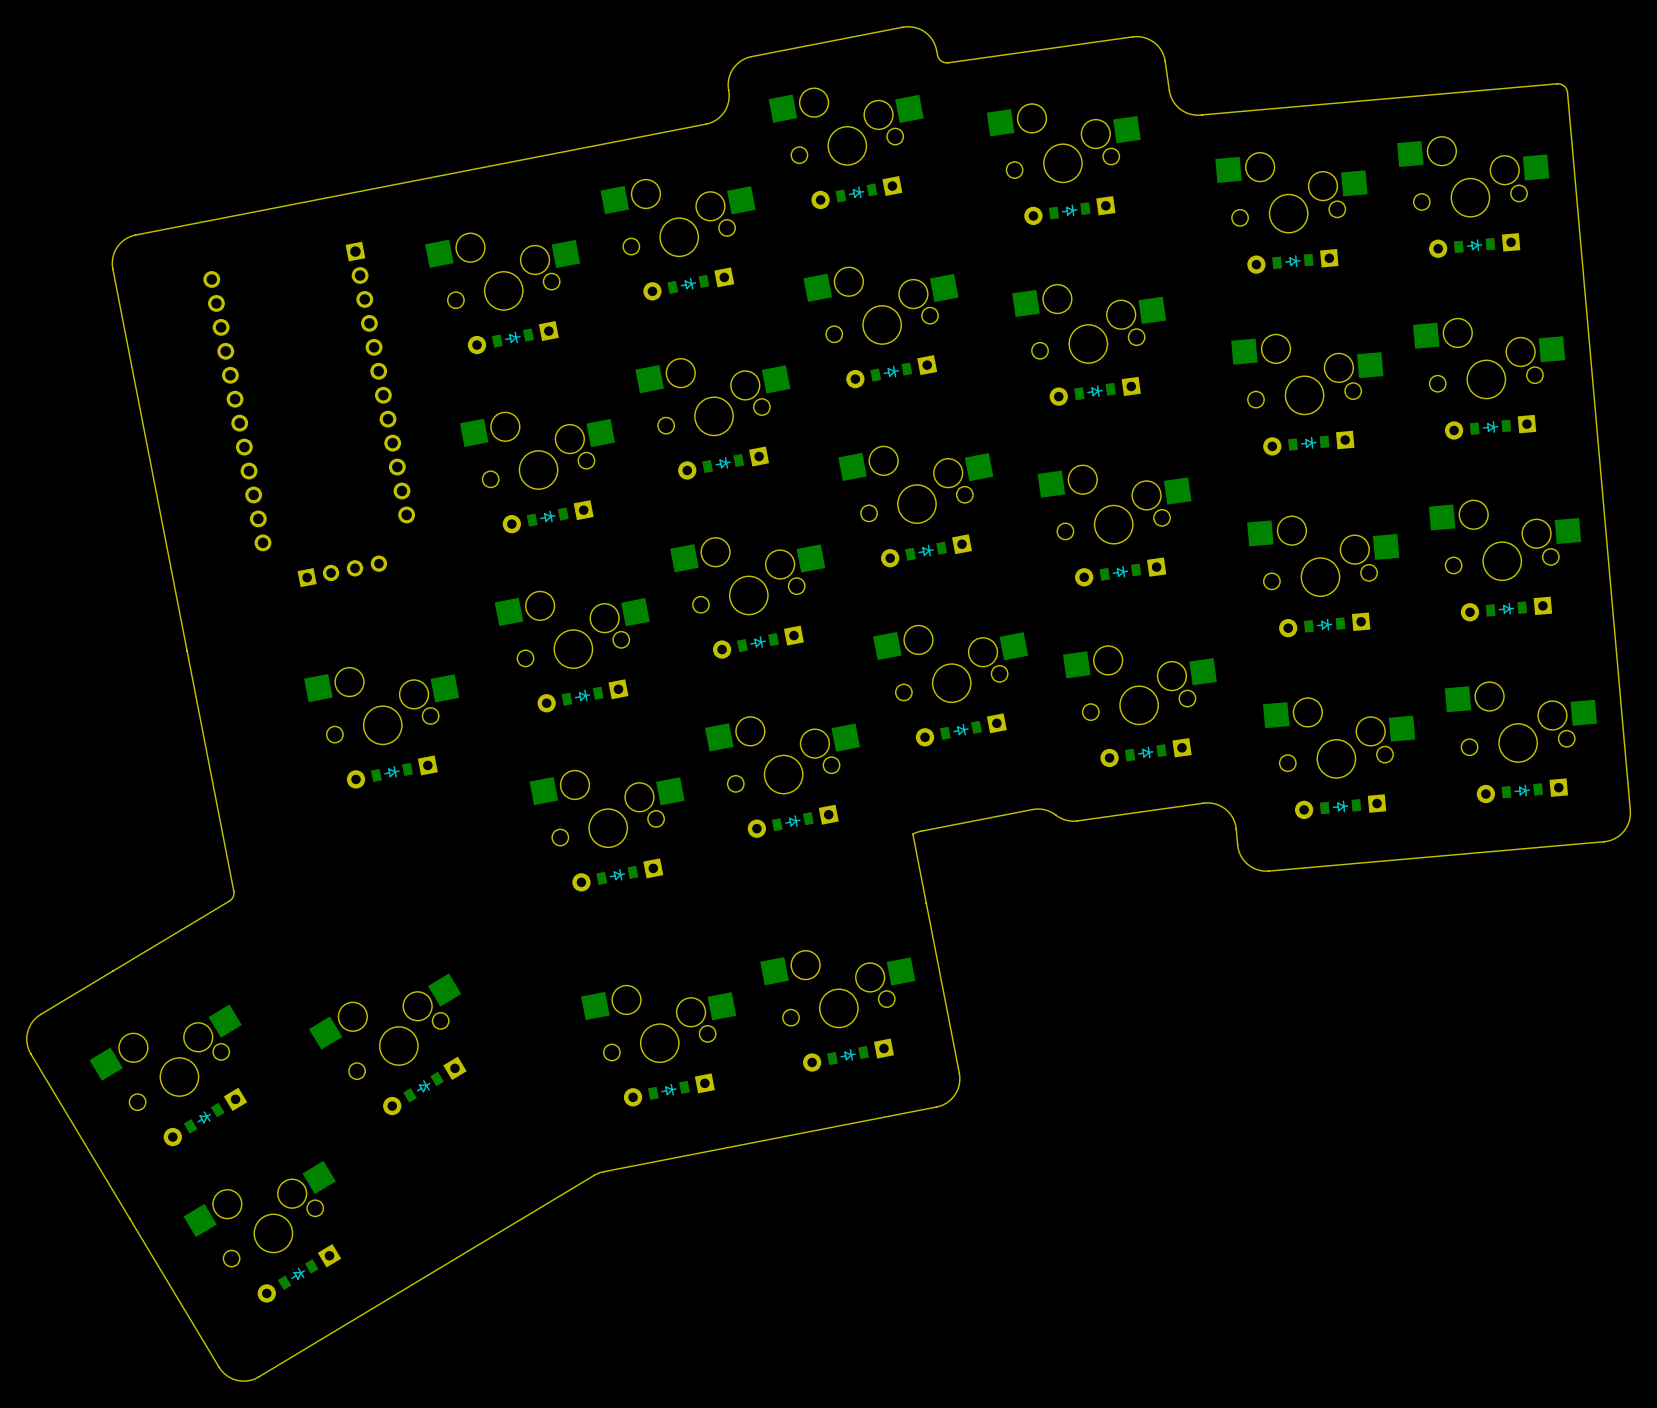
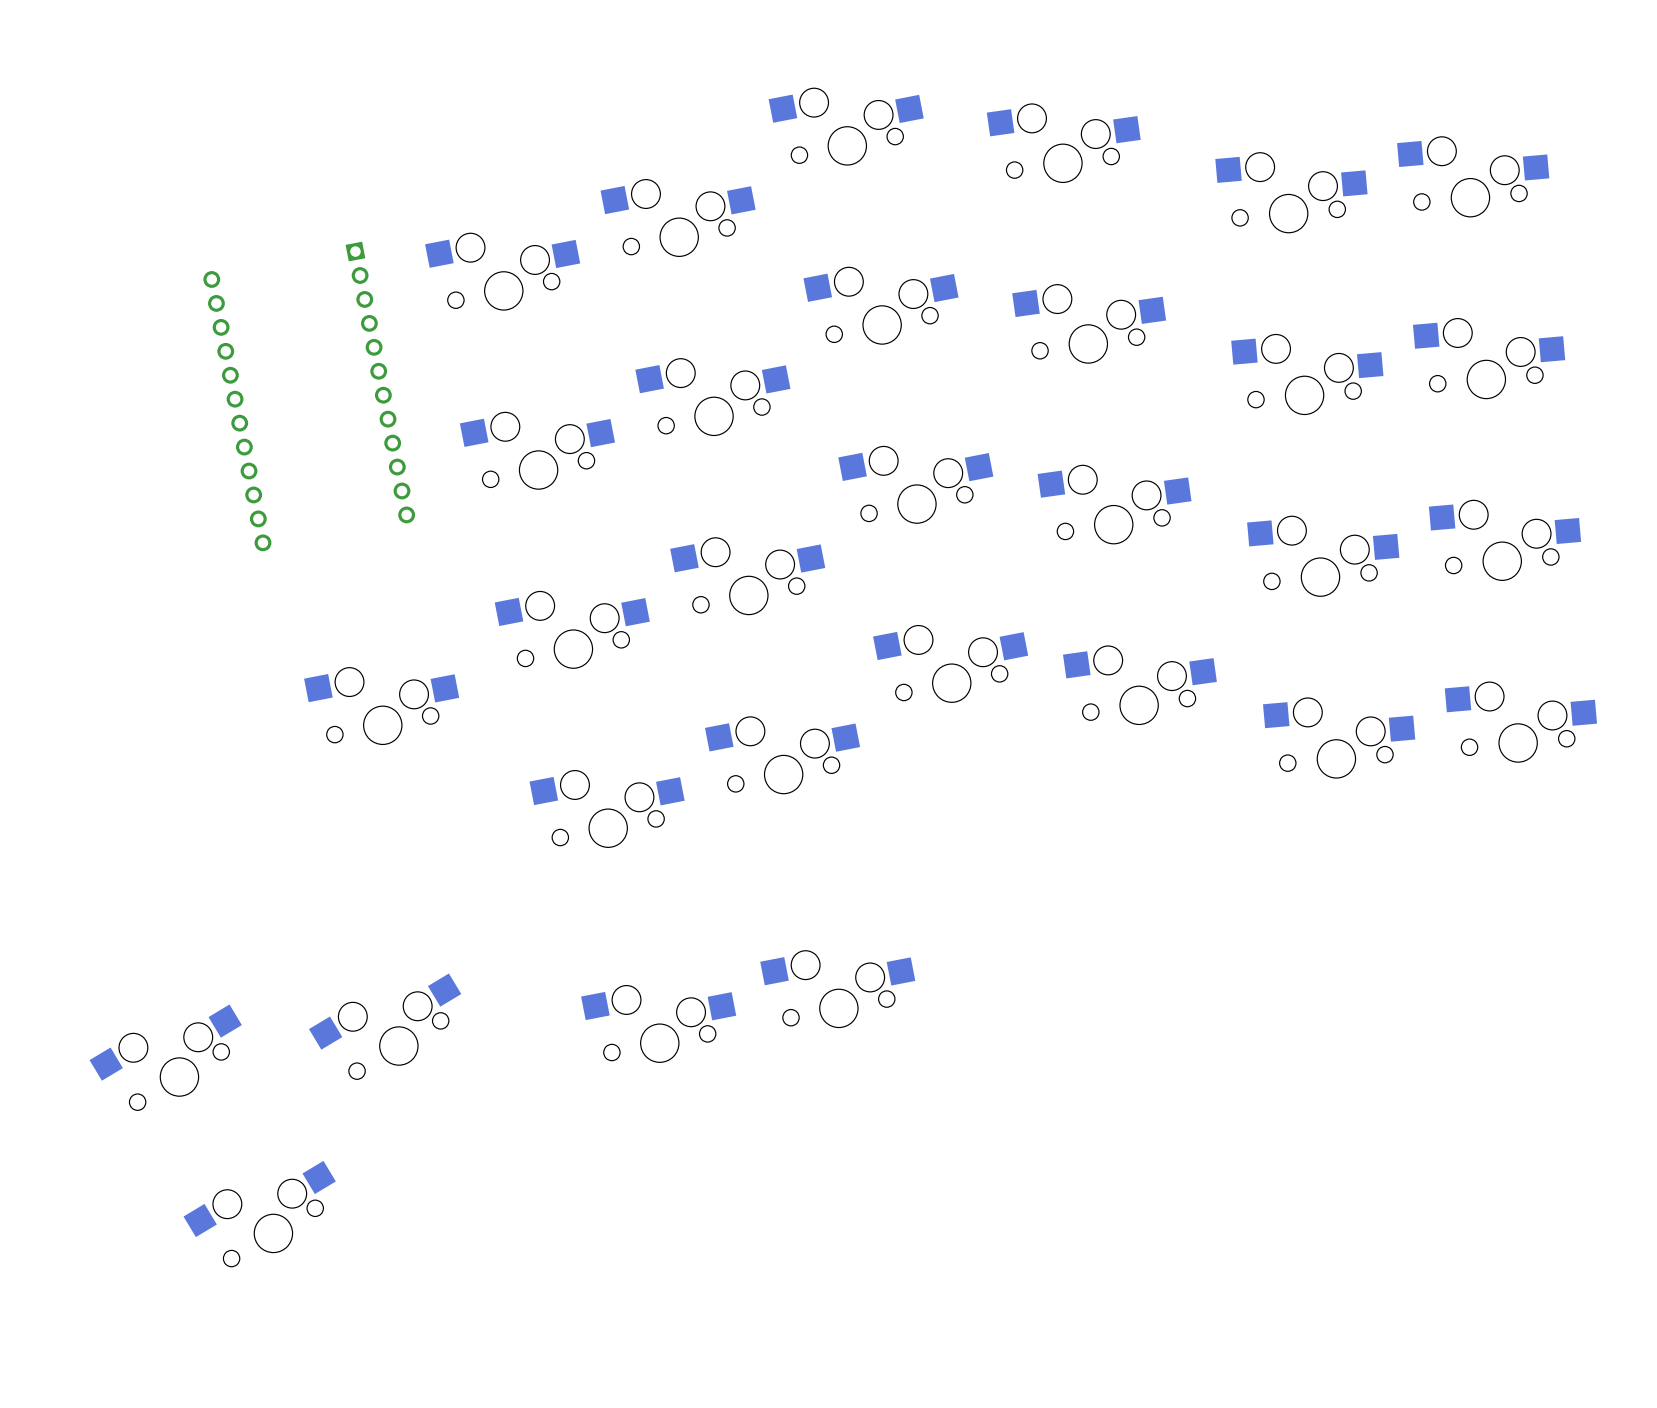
board edge: (1165, 61) (1169, 90) (1172, 100) (1183, 111) (1194, 114) (1557, 83) (1566, 88) (1630, 810) (1629, 821) (1623, 831) (1614, 838) (1604, 841) -> none
board edge: (1165, 61) (1156, 44) (1147, 38) (1136, 36) (945, 62) (938, 58) (934, 42) (927, 33) (914, 27) (902, 27) (744, 59) (735, 65) (729, 75) (729, 97) (726, 108) (719, 117) (709, 123) (135, 235) (121, 242) (114, 252) (112, 268) (233, 893) (229, 901) (37, 1016) (30, 1025) (26, 1035) (30, 1053) -> none
part: (856, 192) -> none
part: (1069, 210) -> none
part: (1474, 245) -> none
part: (1292, 261) -> none
part: (688, 283) -> none
part: (513, 337) -> none
part: (891, 371) -> none
part: (1095, 391) -> none
part: (1490, 427) -> none
part: (1308, 443) -> none
part: (723, 463) -> none
part: (548, 516) -> none
part: (926, 550) -> none
part: (342, 571) -> none
part: (1120, 571) -> none
part: (1506, 609) -> none
part: (1324, 624) -> none
part: (758, 642) -> none
part: (582, 695) -> none
part: (961, 729) -> none
part: (1146, 752) -> none
part: (392, 772) -> none
part: (1522, 790) -> none
part: (1340, 806) -> none
part: (793, 821) -> none
board edge: (1236, 829) (1237, 844) -> none
board edge: (1236, 829) (1233, 819) (1227, 811) (1219, 805) (1206, 802) (1074, 821) (1063, 819) (1047, 810) (1035, 809) (912, 834) (959, 1076) (957, 1089) (948, 1101) (936, 1107) (598, 1173) (258, 1377) (248, 1380) (229, 1377) (219, 1367) (30, 1053) -> none
board edge: (1604, 841) (1265, 871) (1247, 864) (1240, 855) (1237, 844) -> none
part: (617, 874) -> none
part: (848, 1055) -> none
part: (424, 1085) -> none
part: (669, 1089) -> none
part: (205, 1116) -> none
part: (299, 1273) -> none

